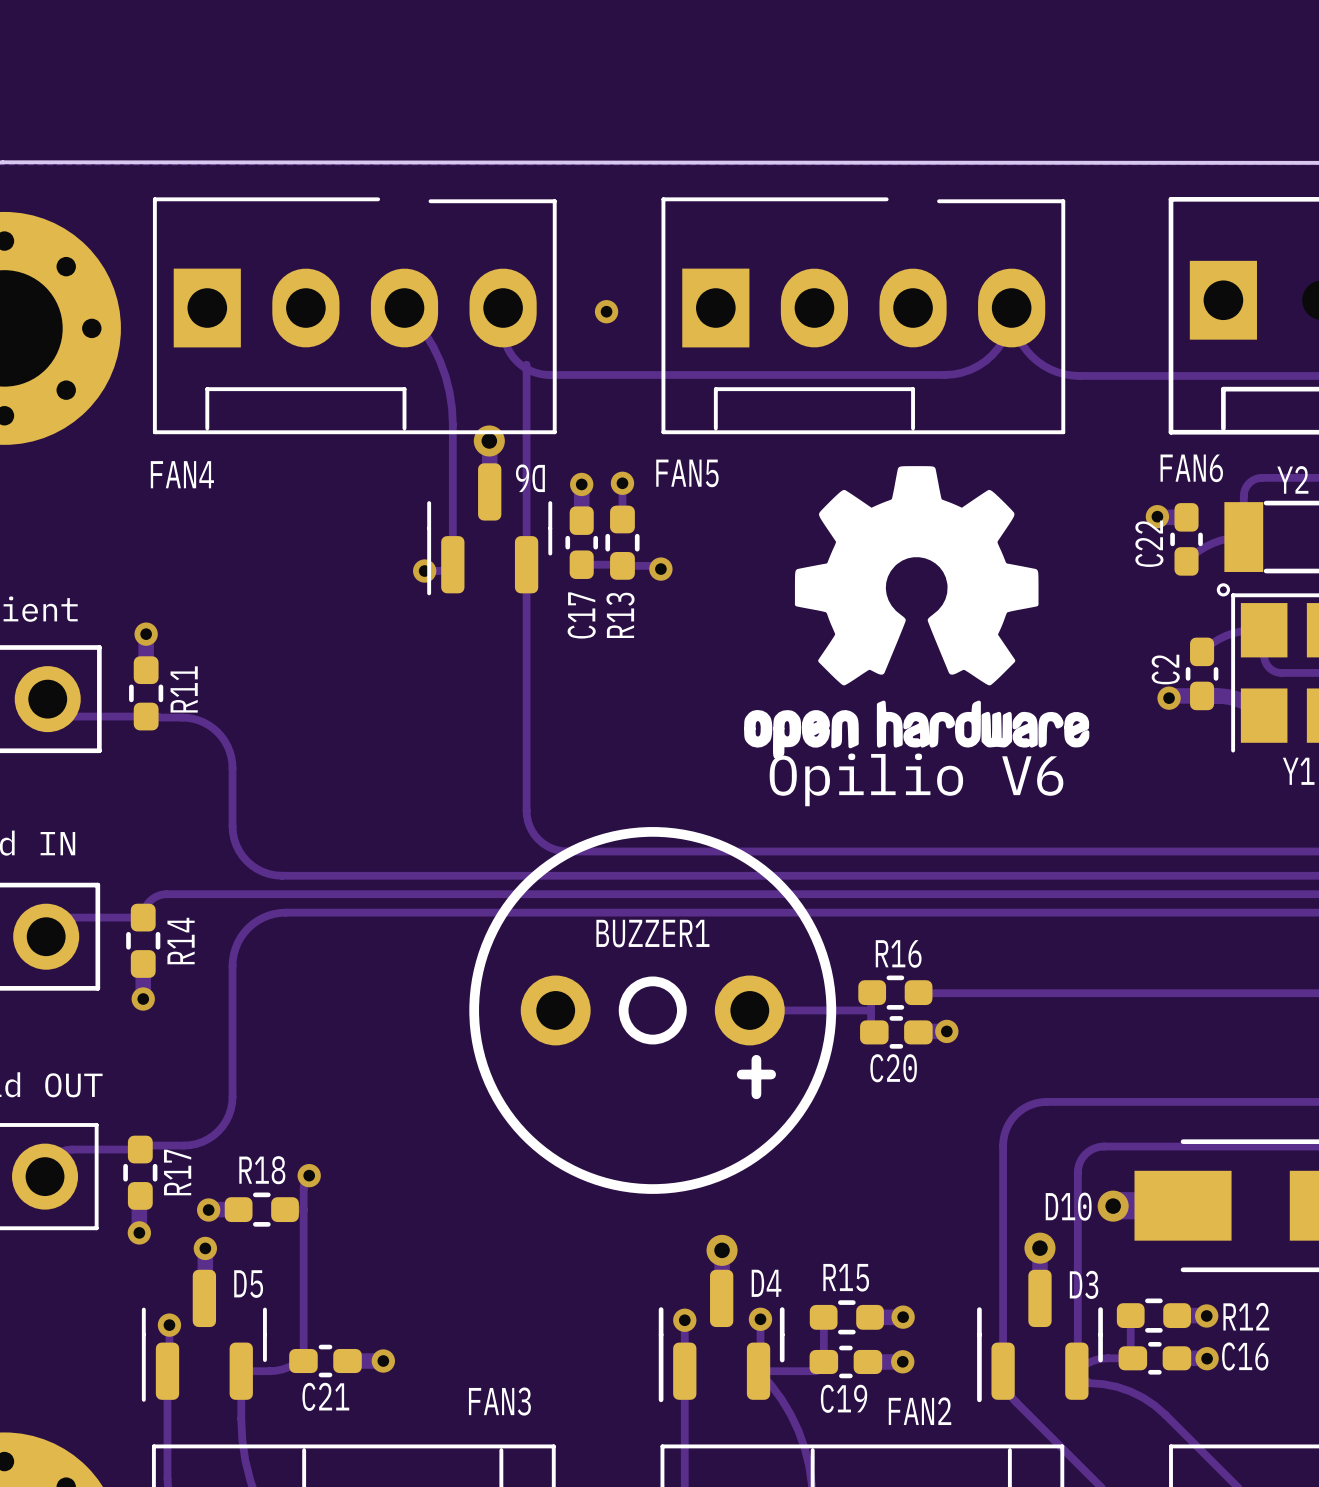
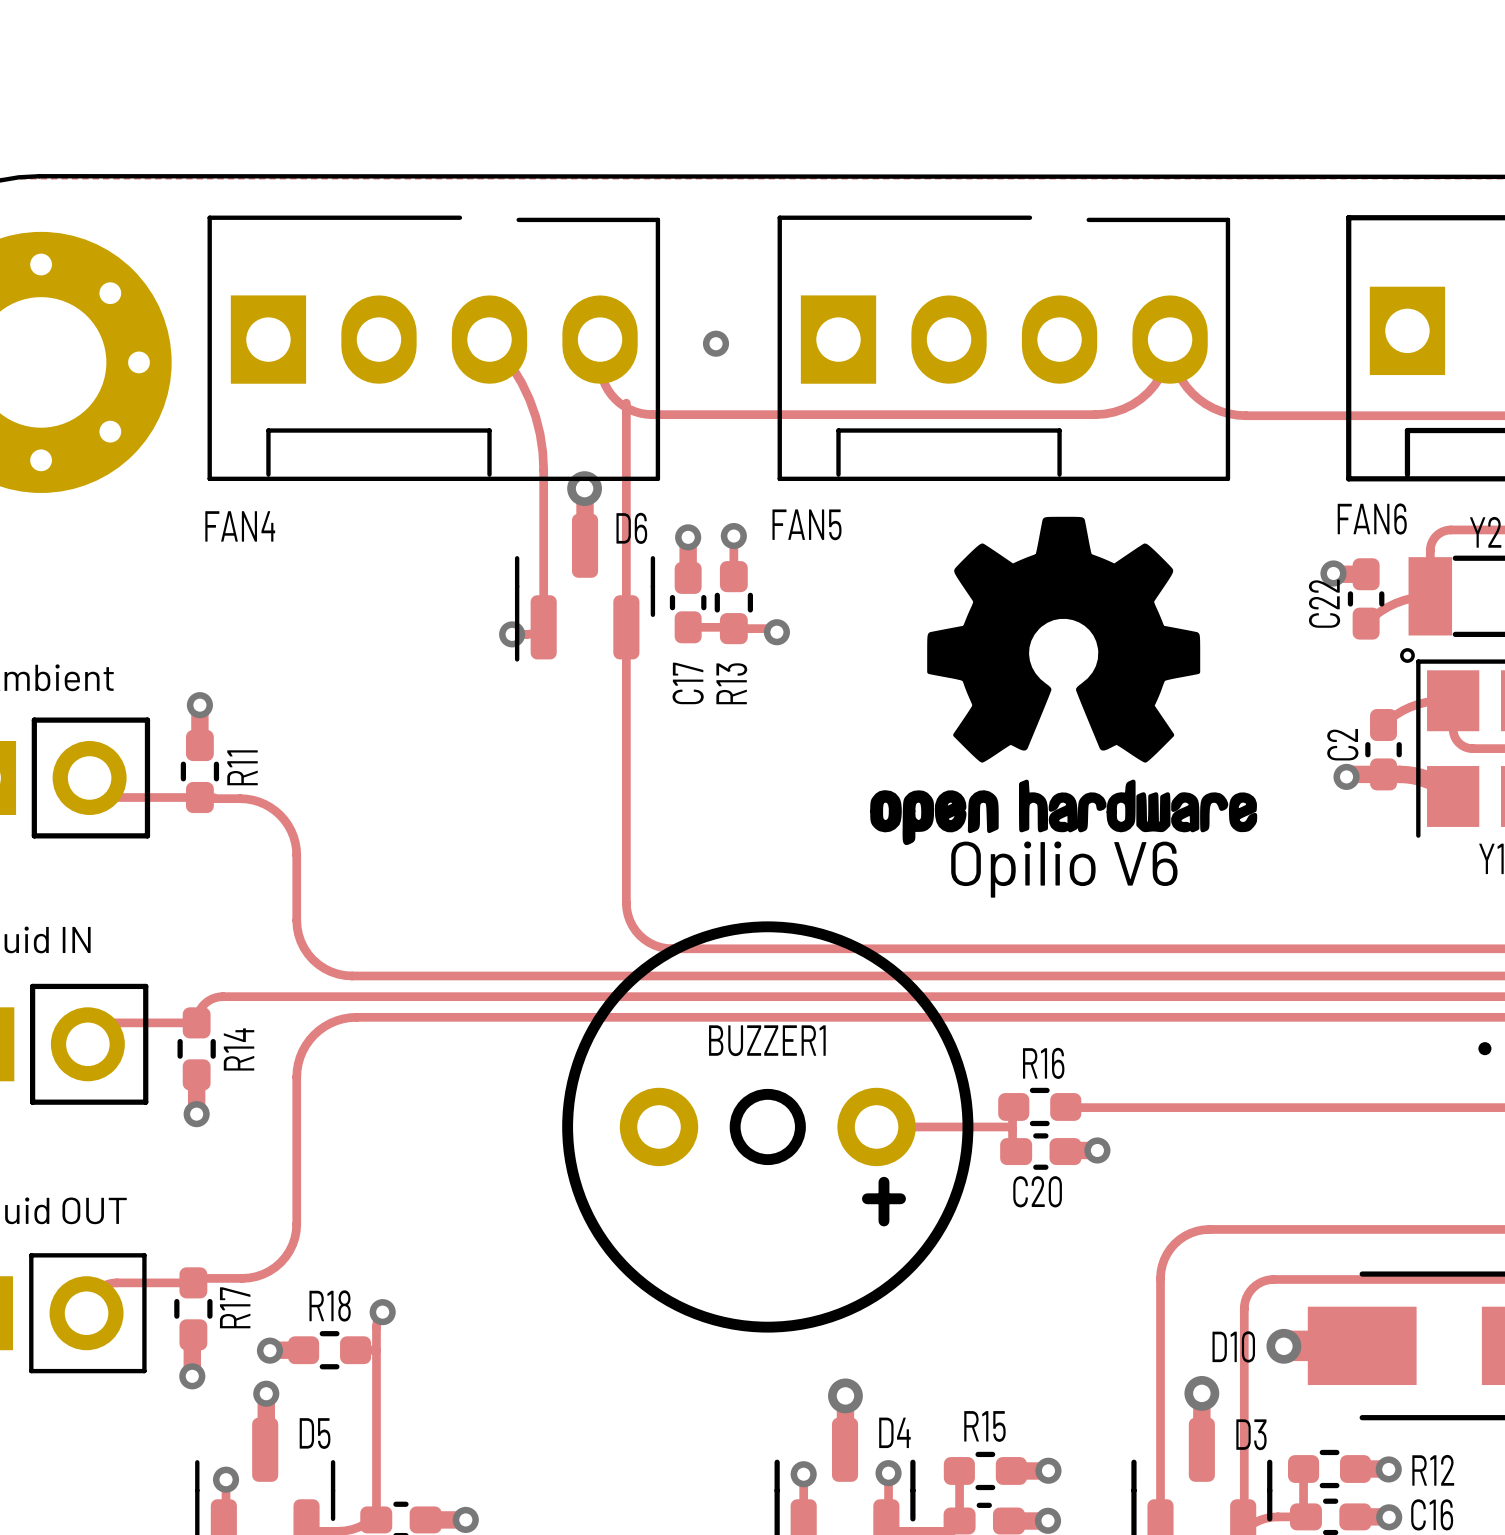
D6 name rotation: 0° (530, 478) -> 180° (631, 528)
drawing: none -> [1478, 1042, 1492, 1056]

